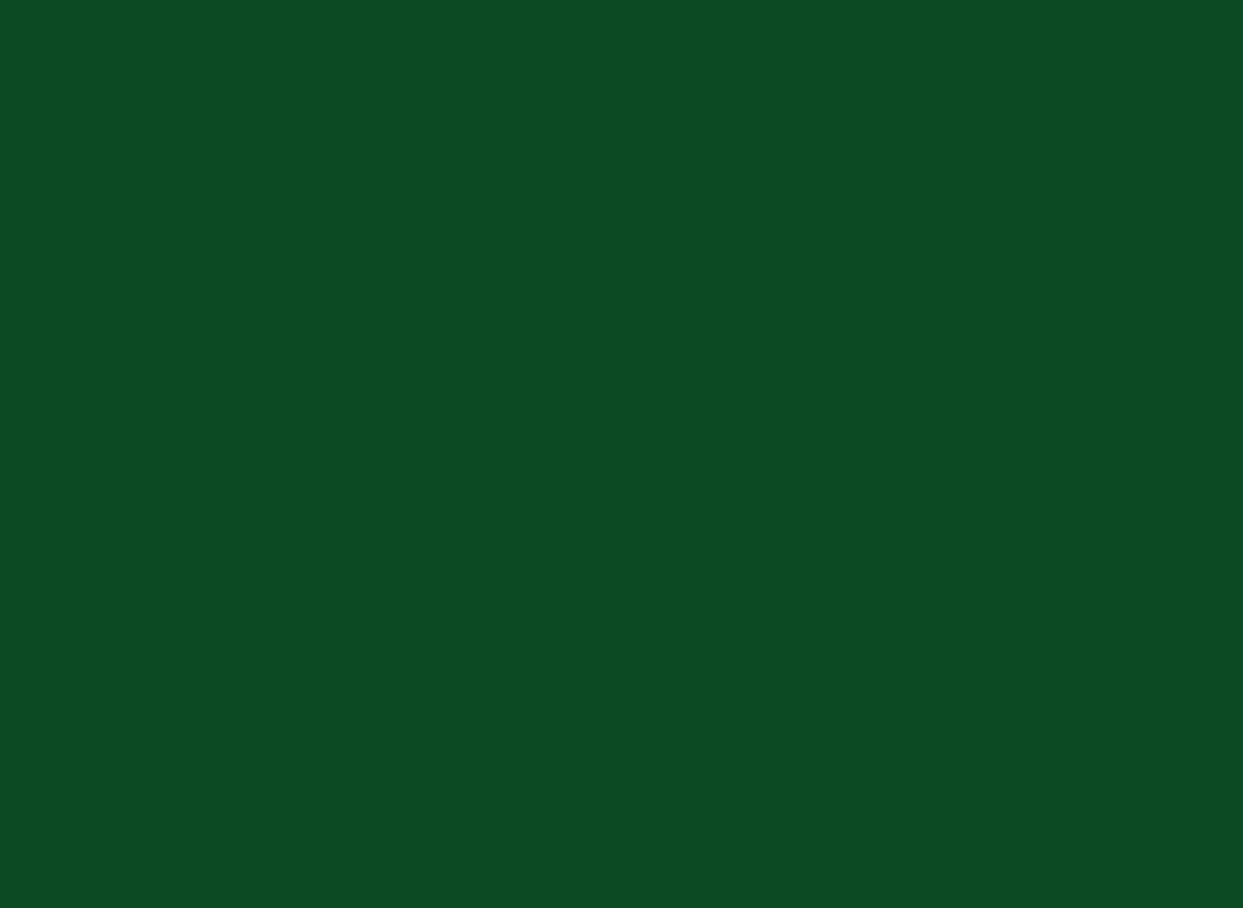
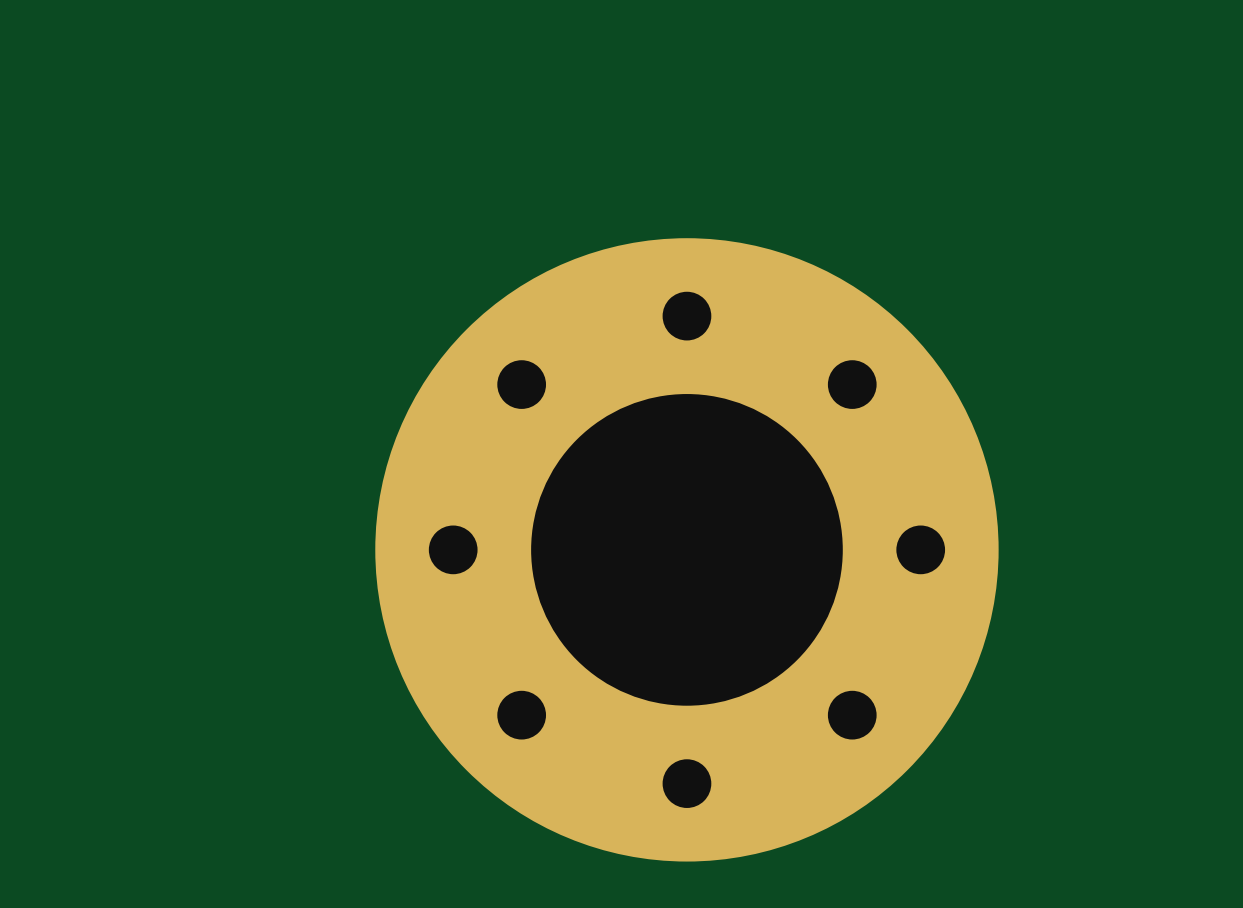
part: none -> (686, 549)

